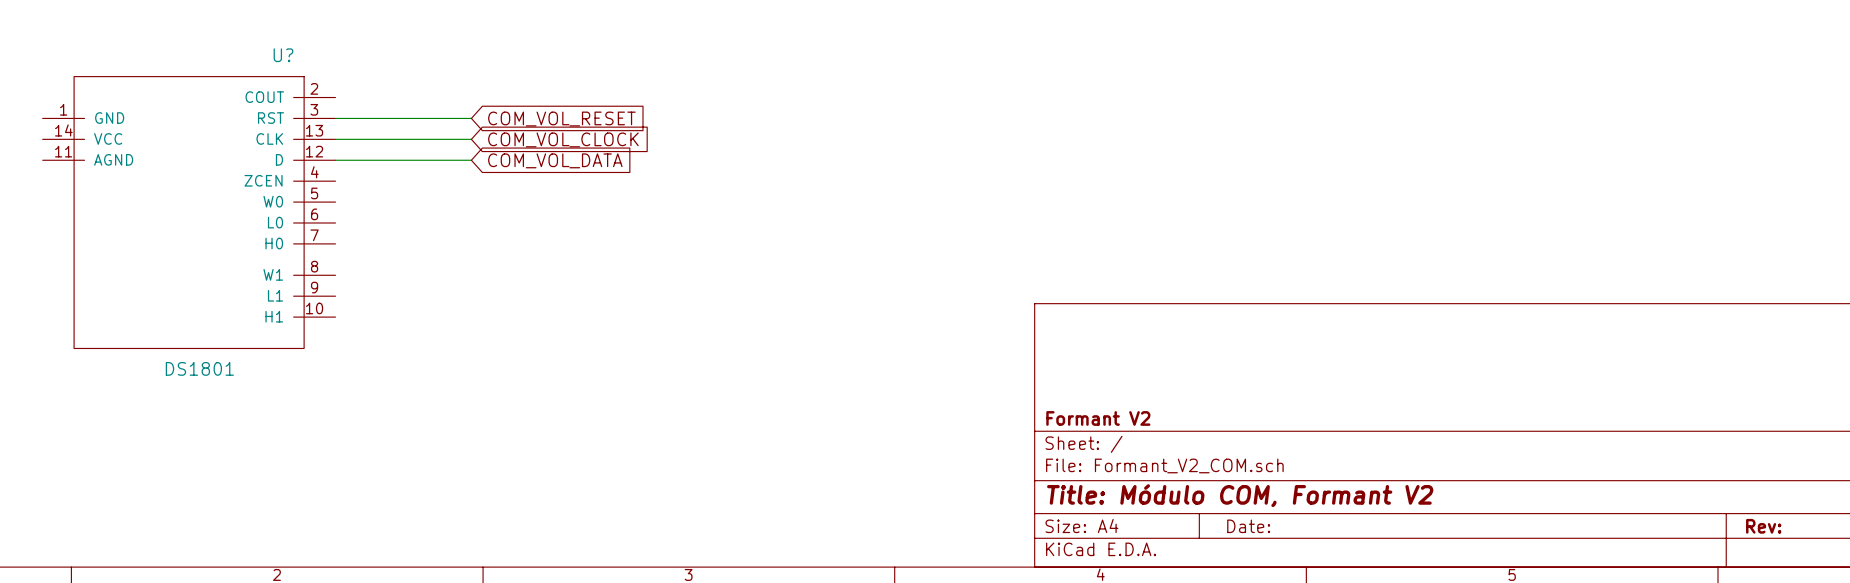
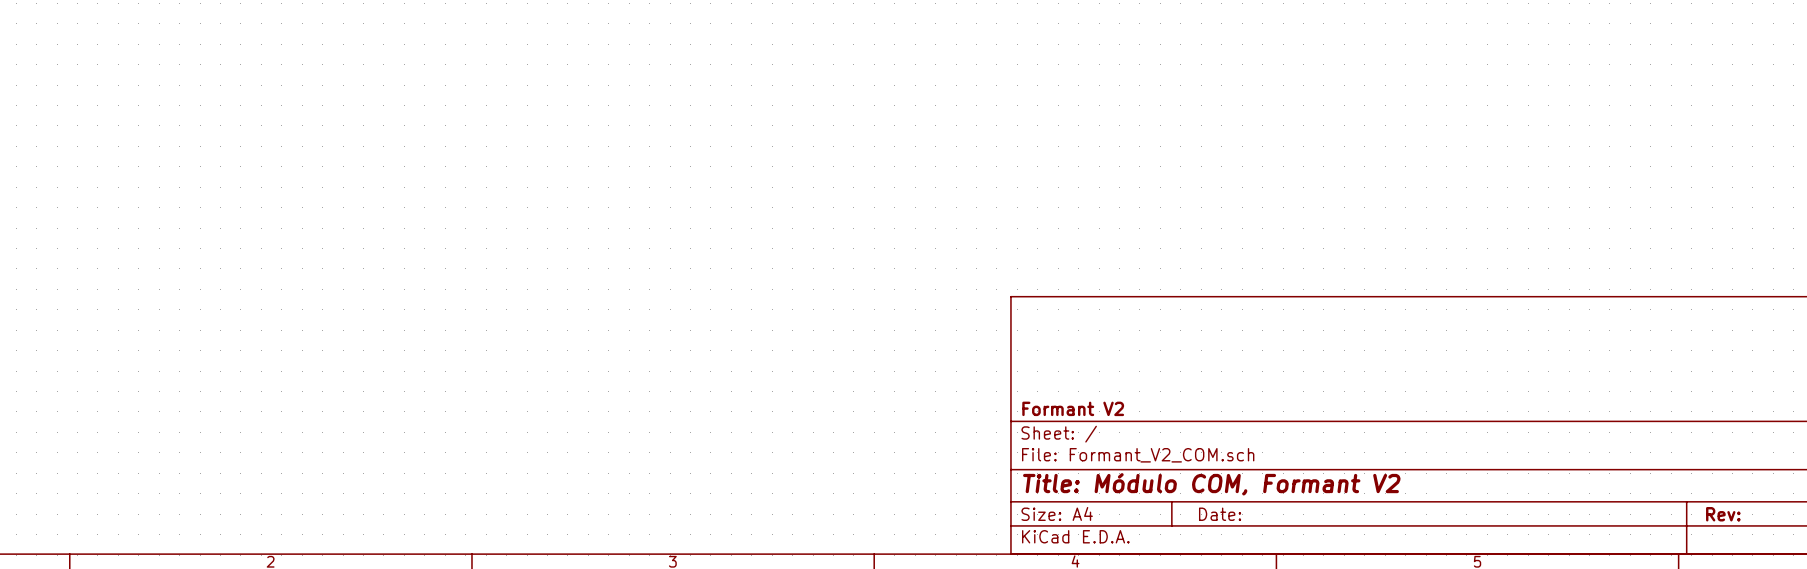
wire: (335, 118) (471, 118) -> none
global label: COM_VOL_RESET (561, 119) -> none
wire: (335, 139) (471, 139) -> none
global label: COM_VOL_CLOCK (563, 139) -> none
wire: (335, 160) (471, 160) -> none
global label: COM_VOL_DATA (555, 160) -> none
U?: DS1801 (189, 212) -> none

